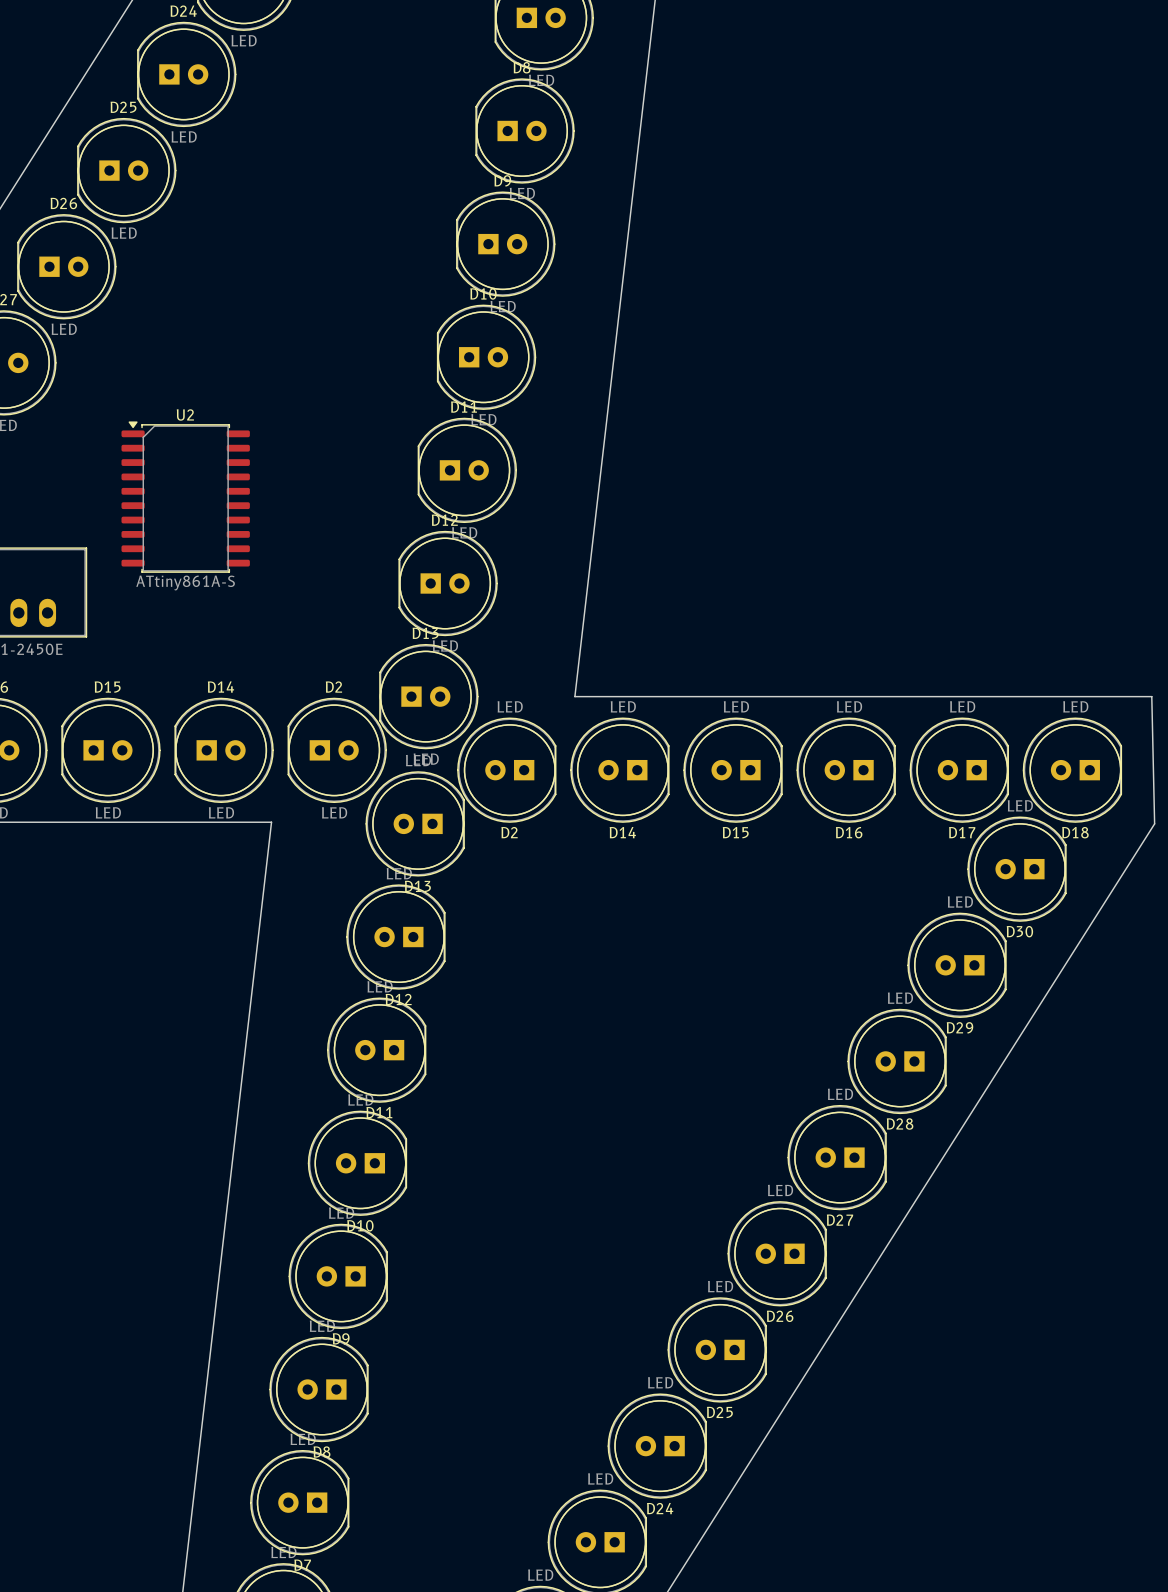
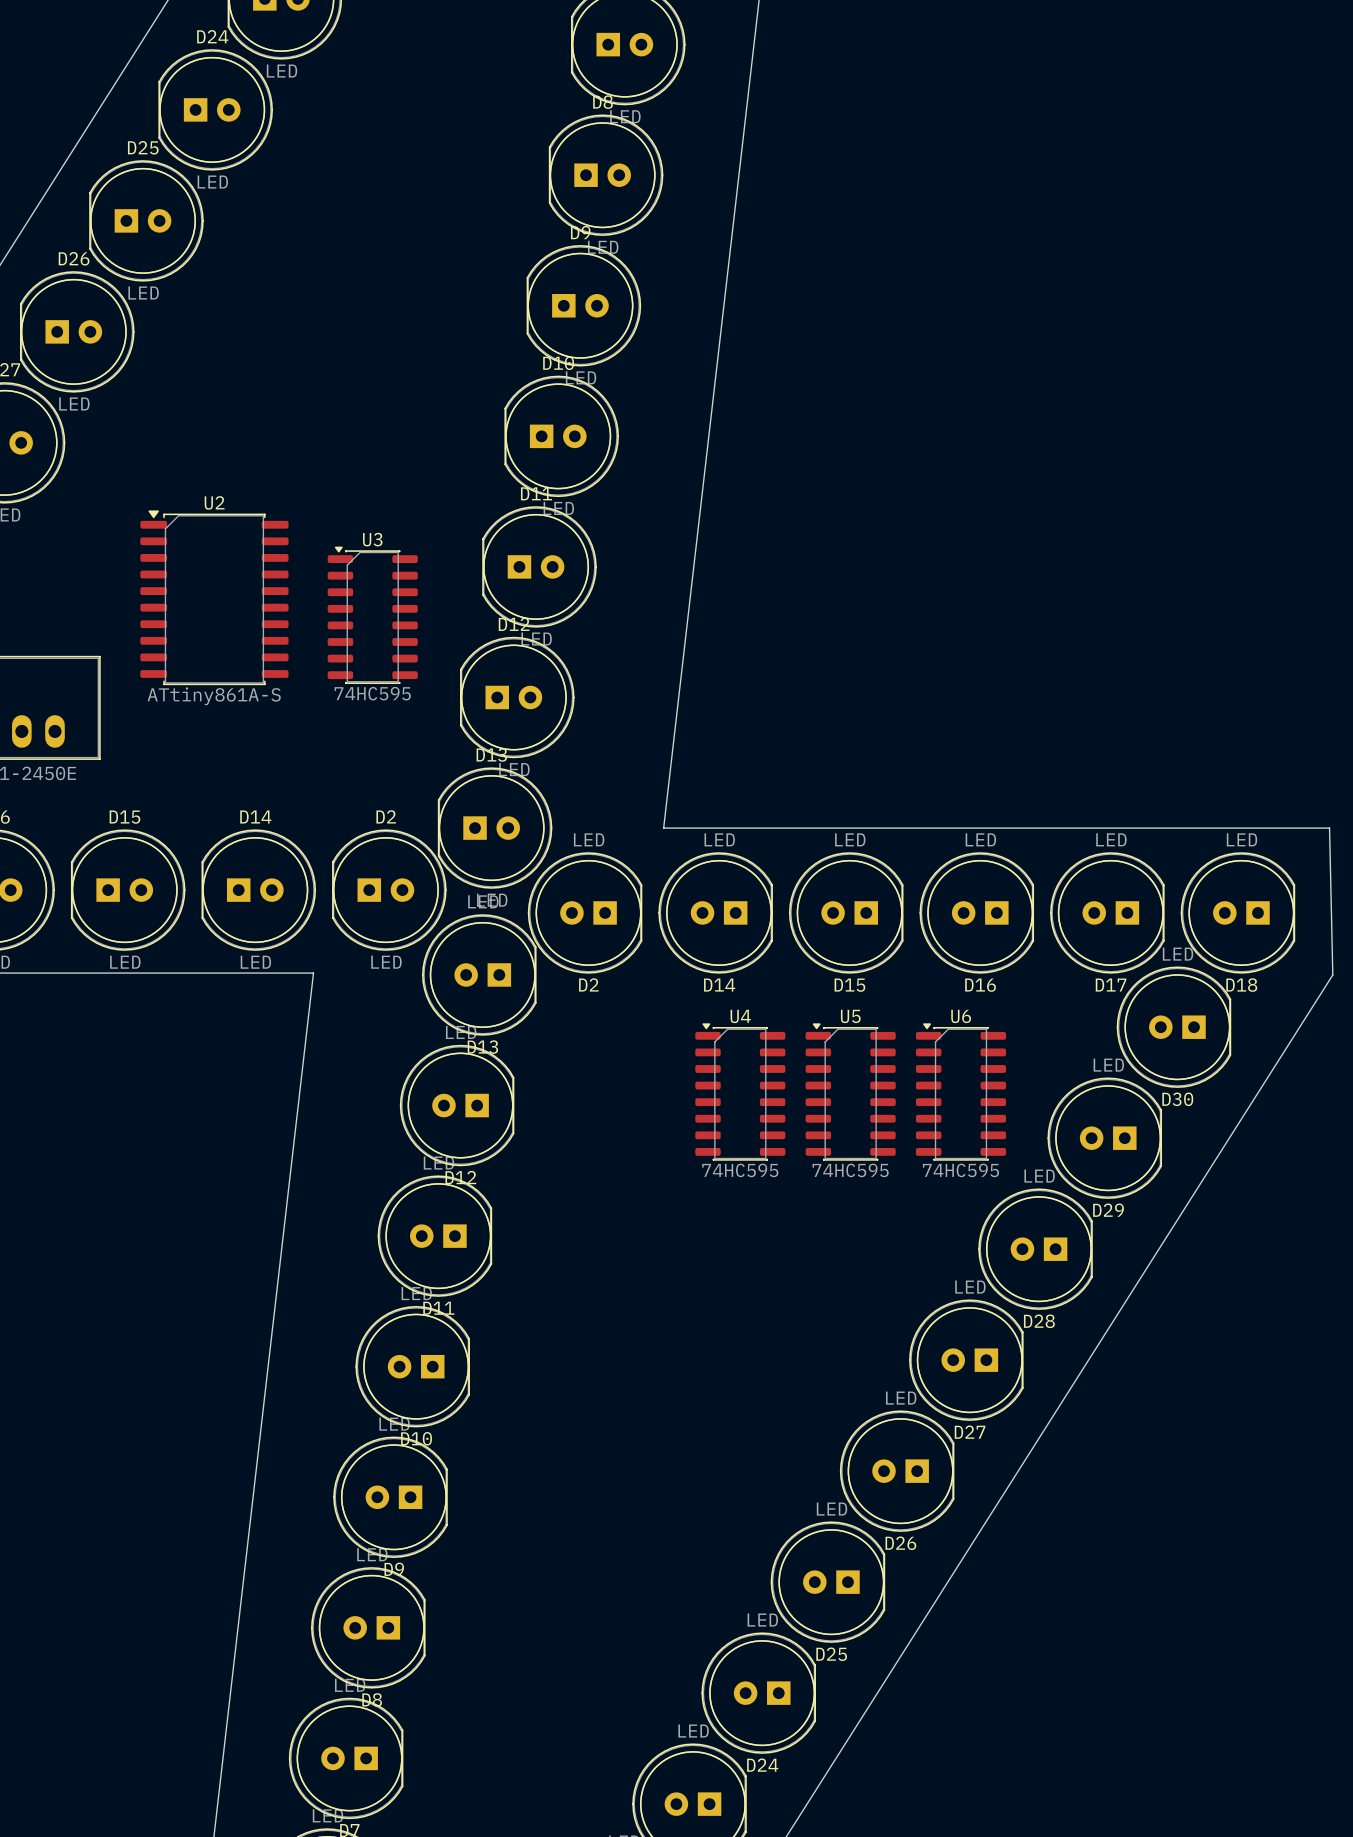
U3: none -> 74HC595 (372, 615)
U4: none -> 74HC595 (740, 1092)
U5: none -> 74HC595 (850, 1092)
U6: none -> 74HC595 (960, 1092)

